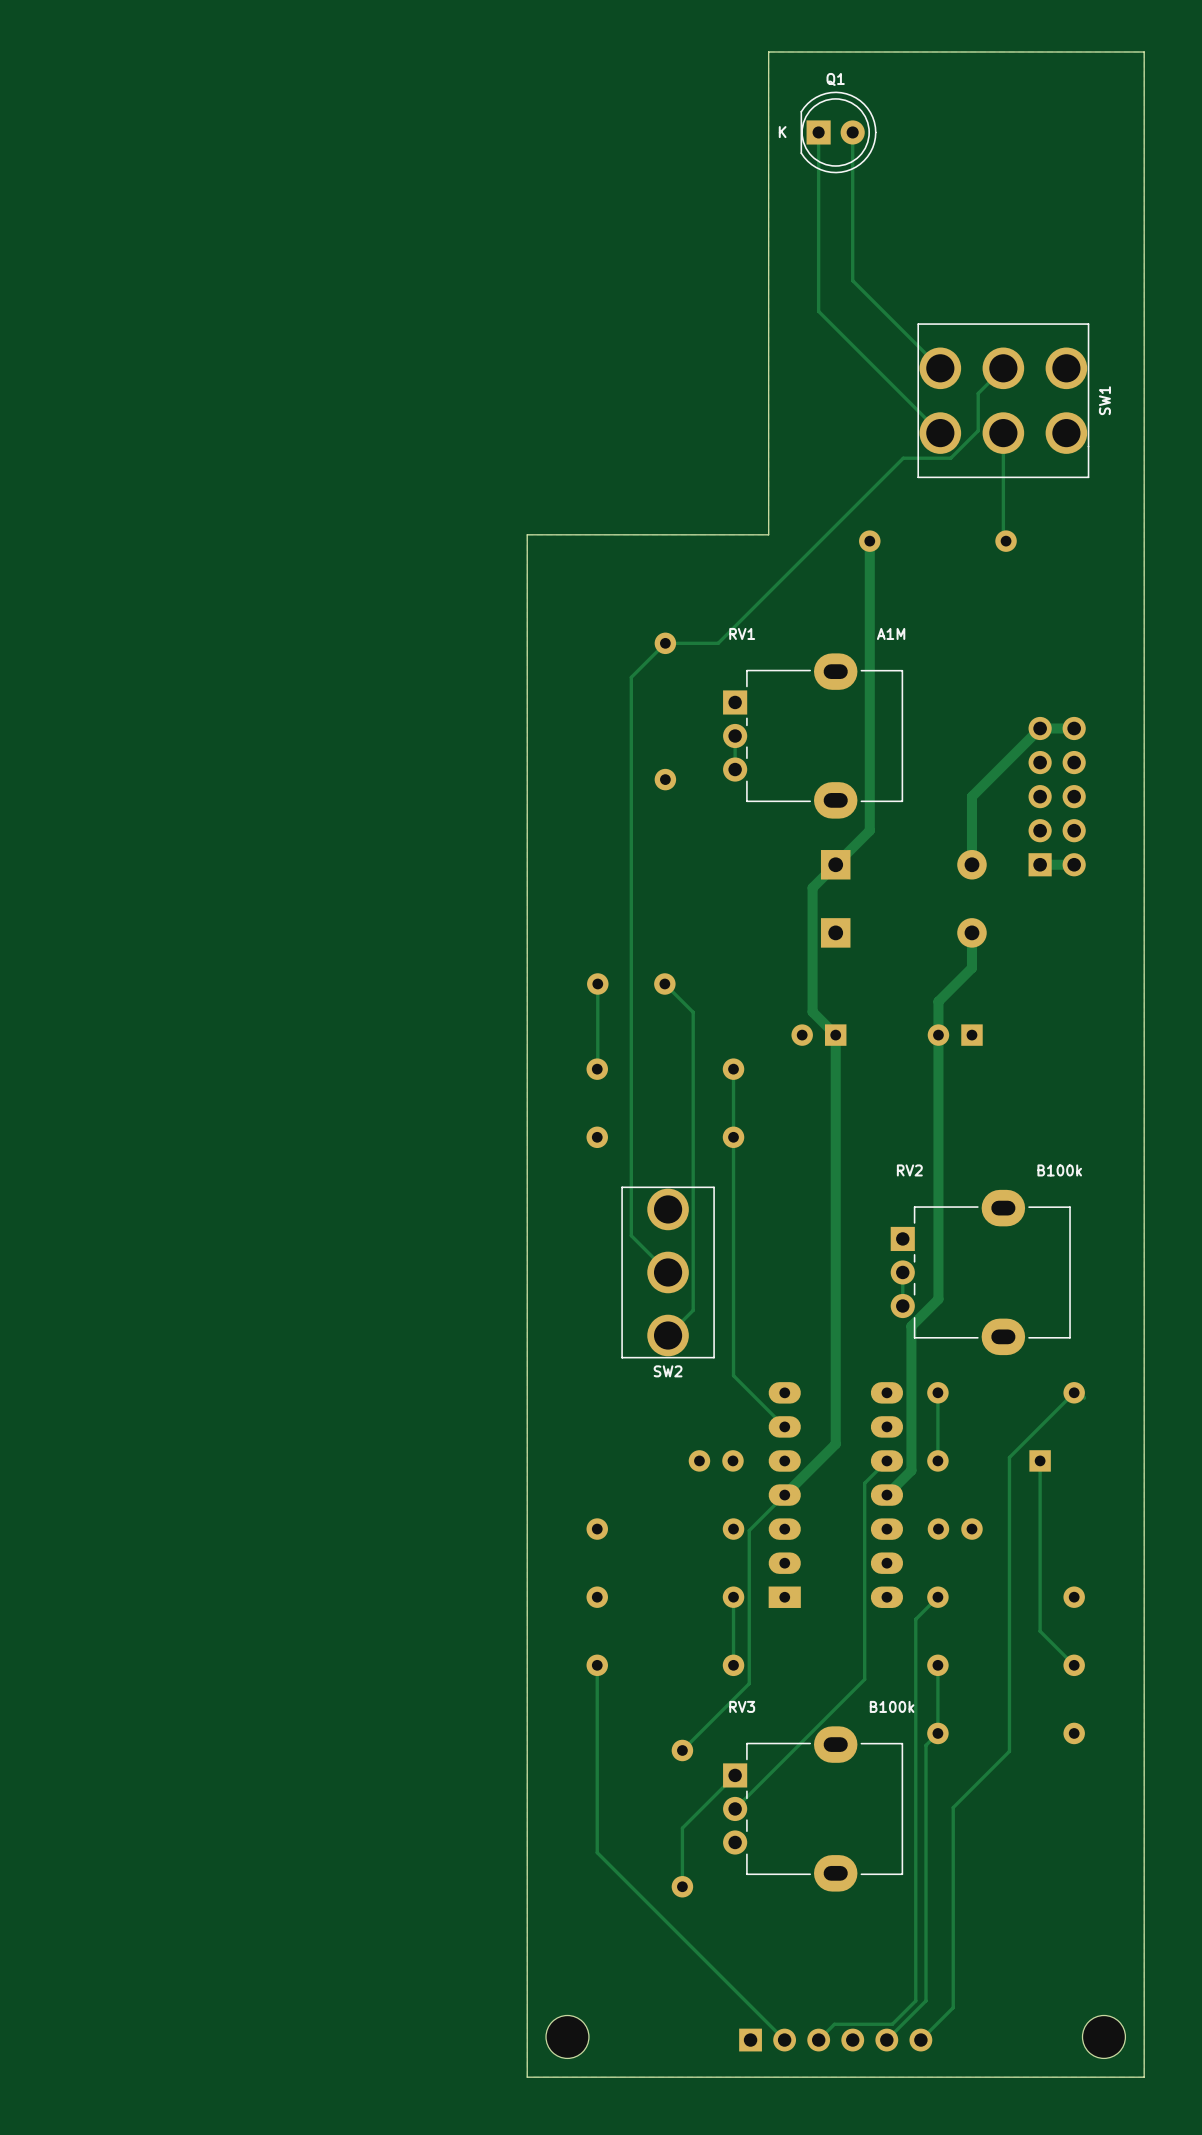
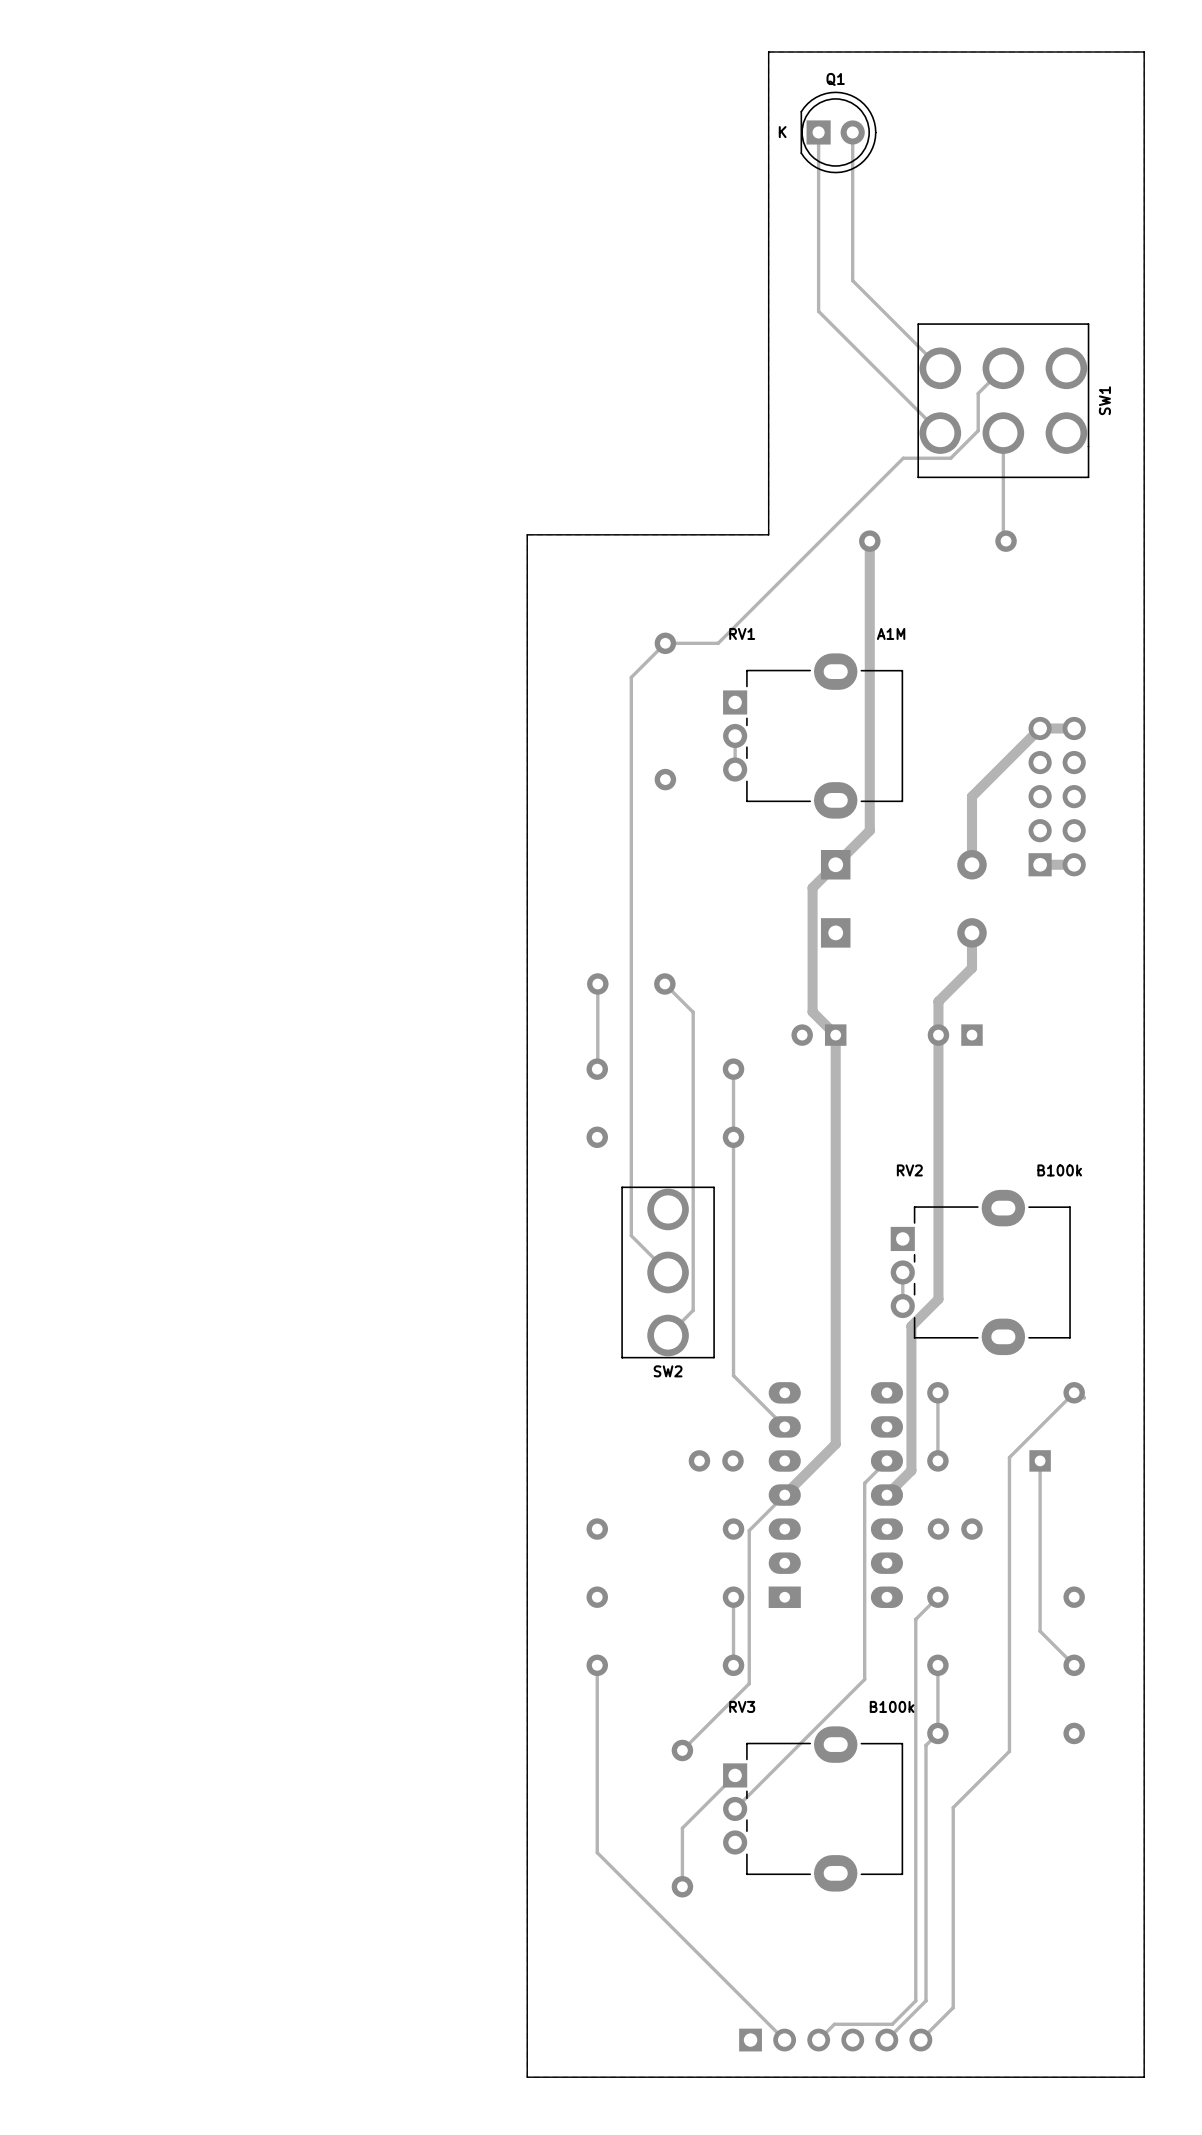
part: (567, 2036) -> none
part: (1103, 2036) -> none

